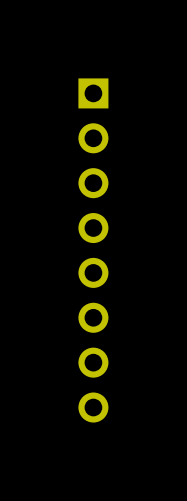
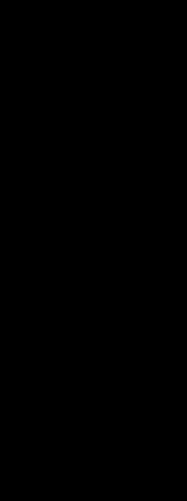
part: (93, 250) -> none

